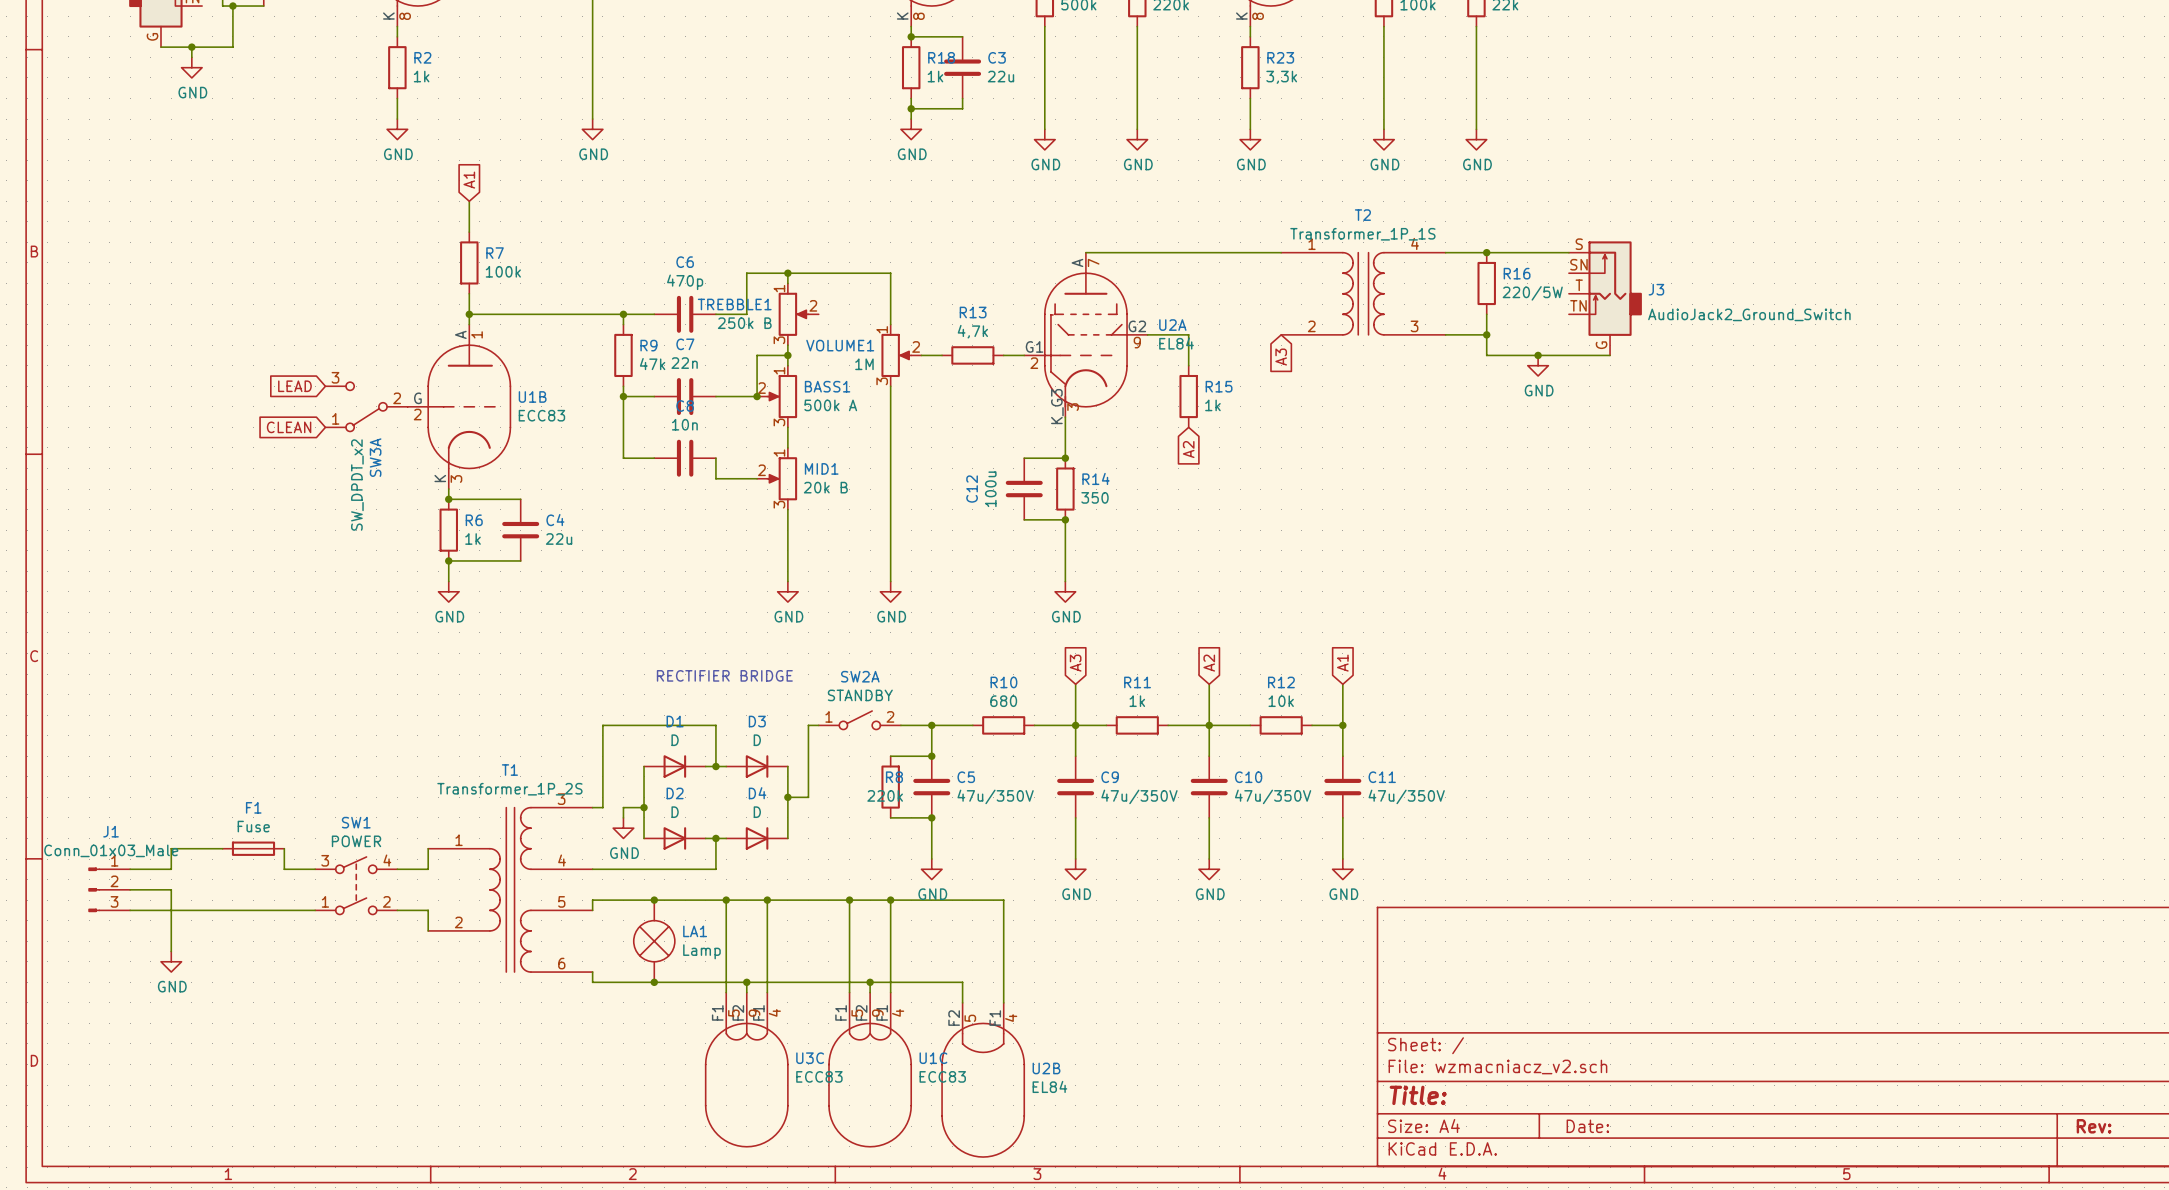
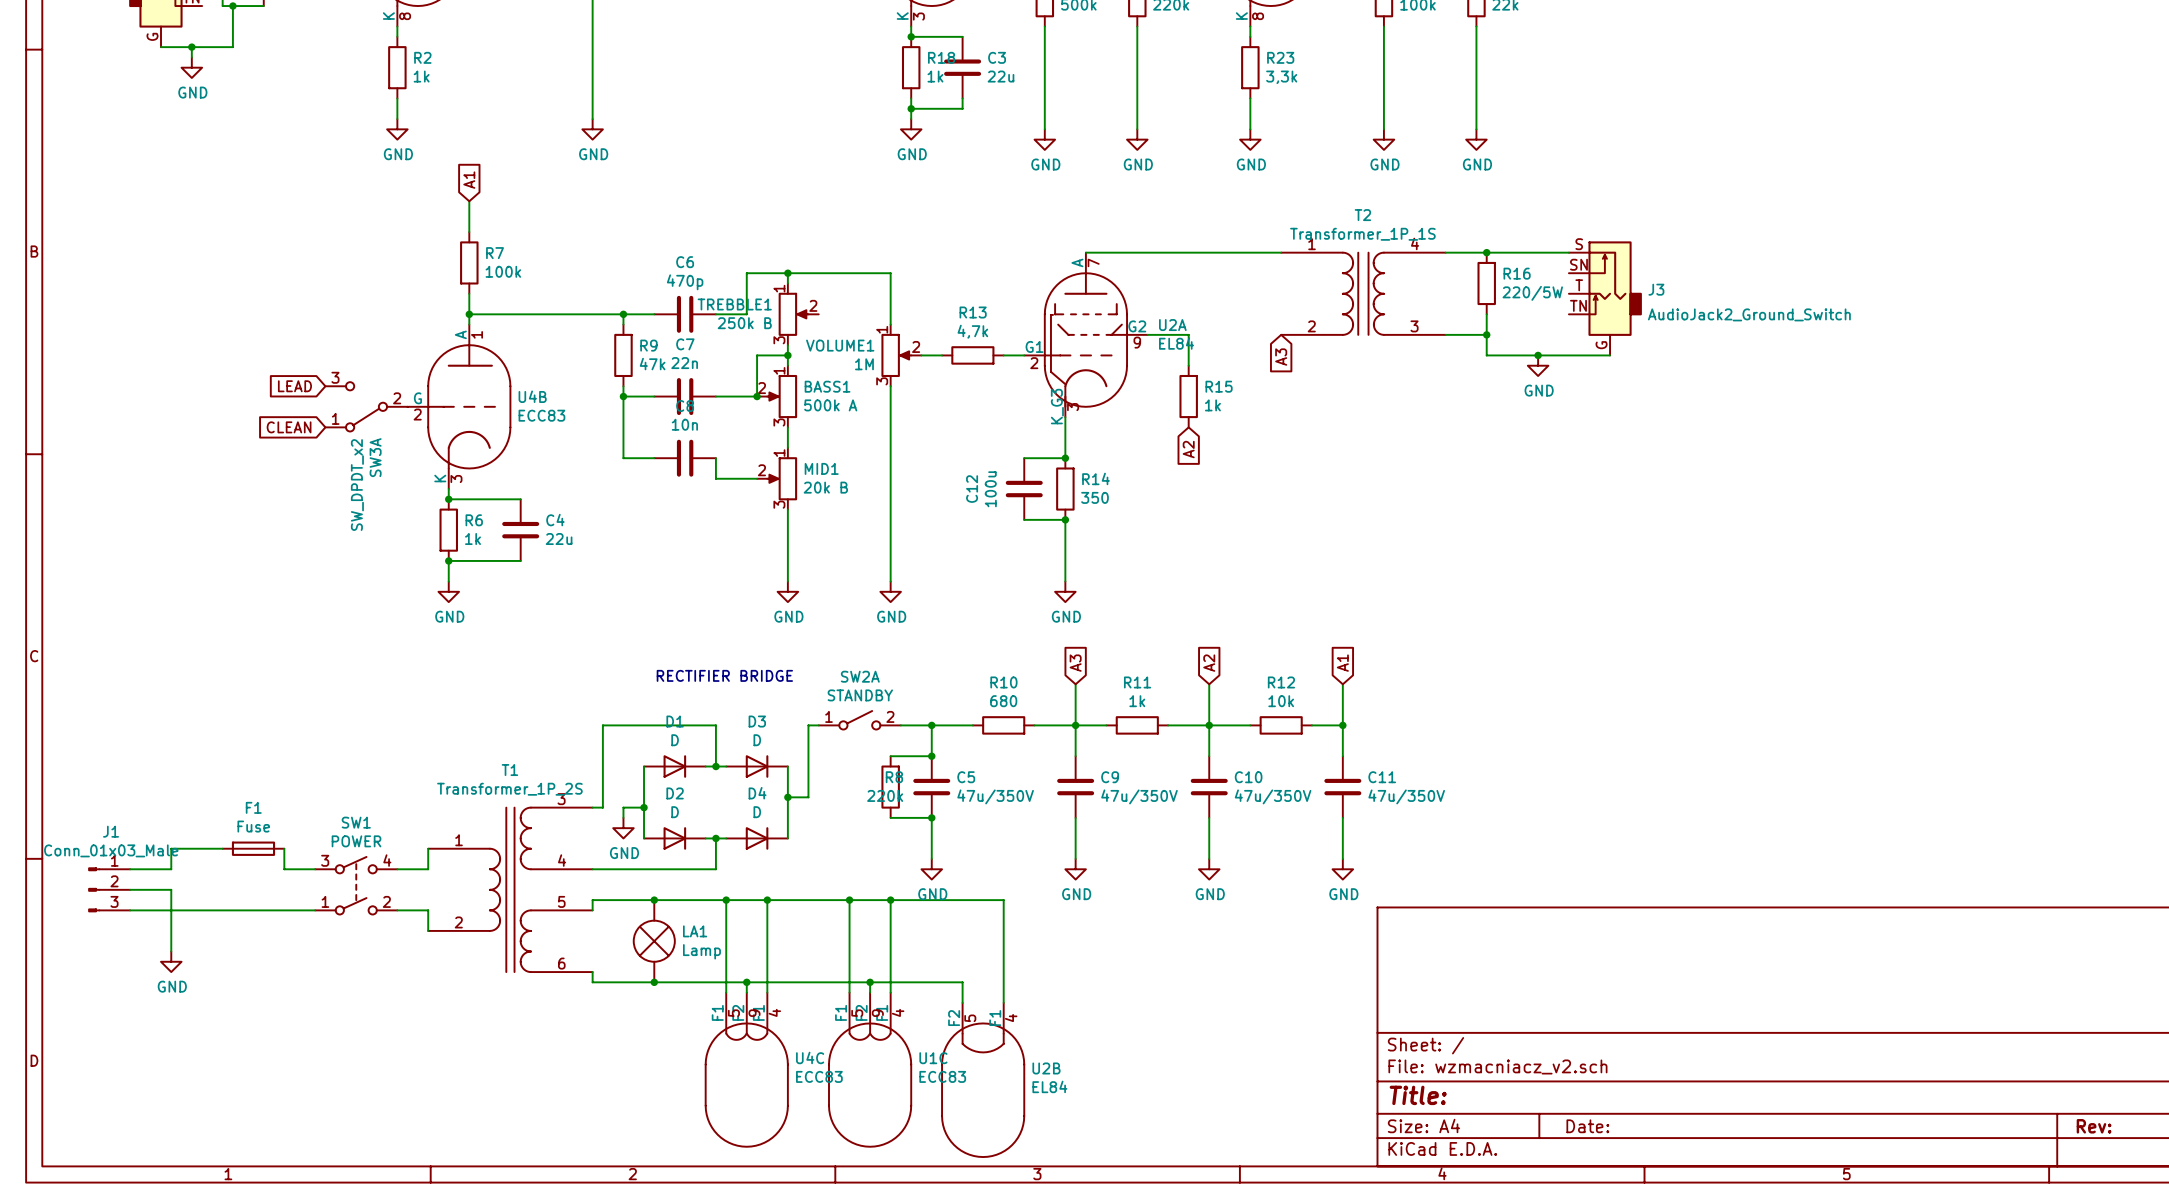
part pin number: 8 (918, 16) -> 3 (918, 16)
U1B name: U1B (532, 396) -> U4B (532, 396)
U3C name: U3C (810, 1058) -> U4C (810, 1057)

